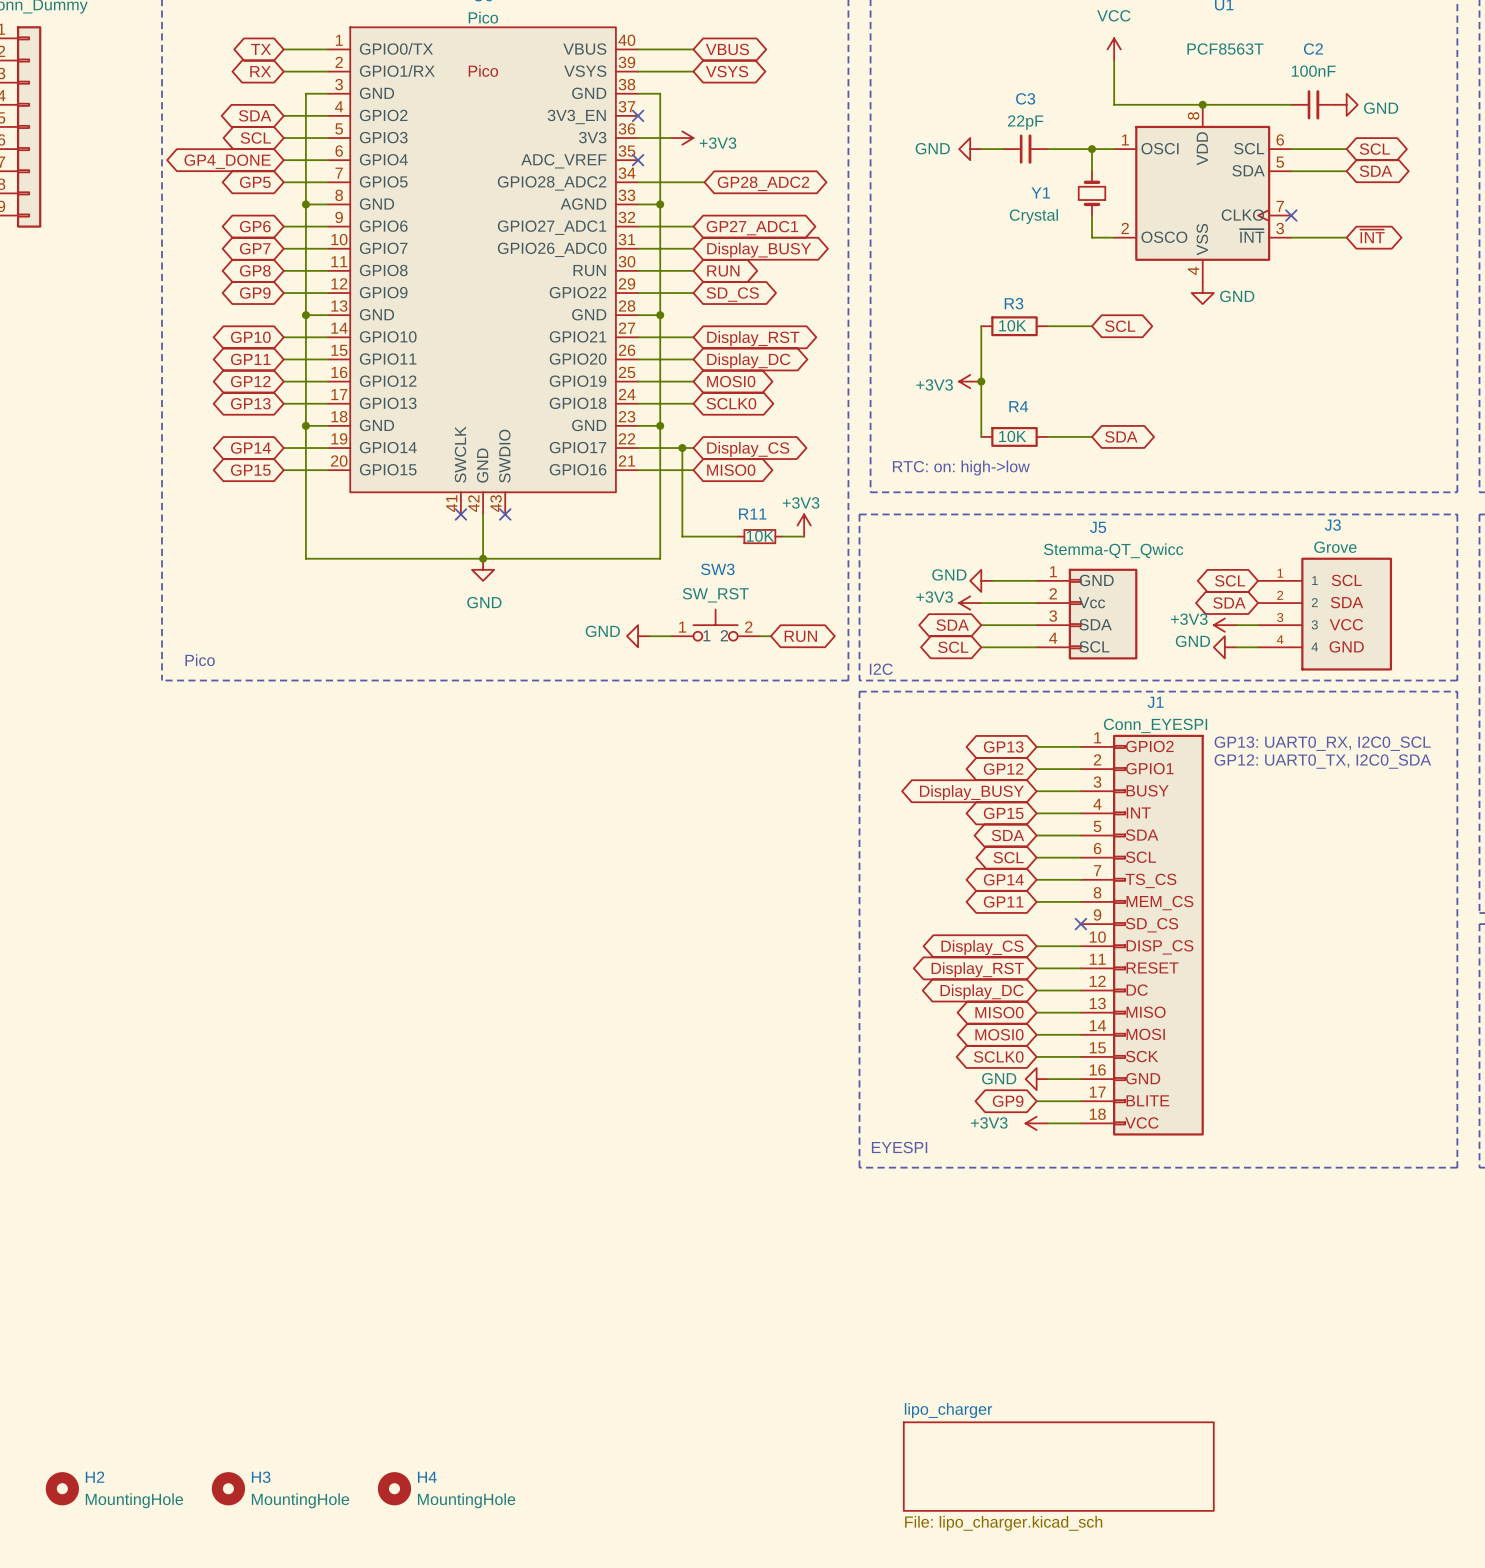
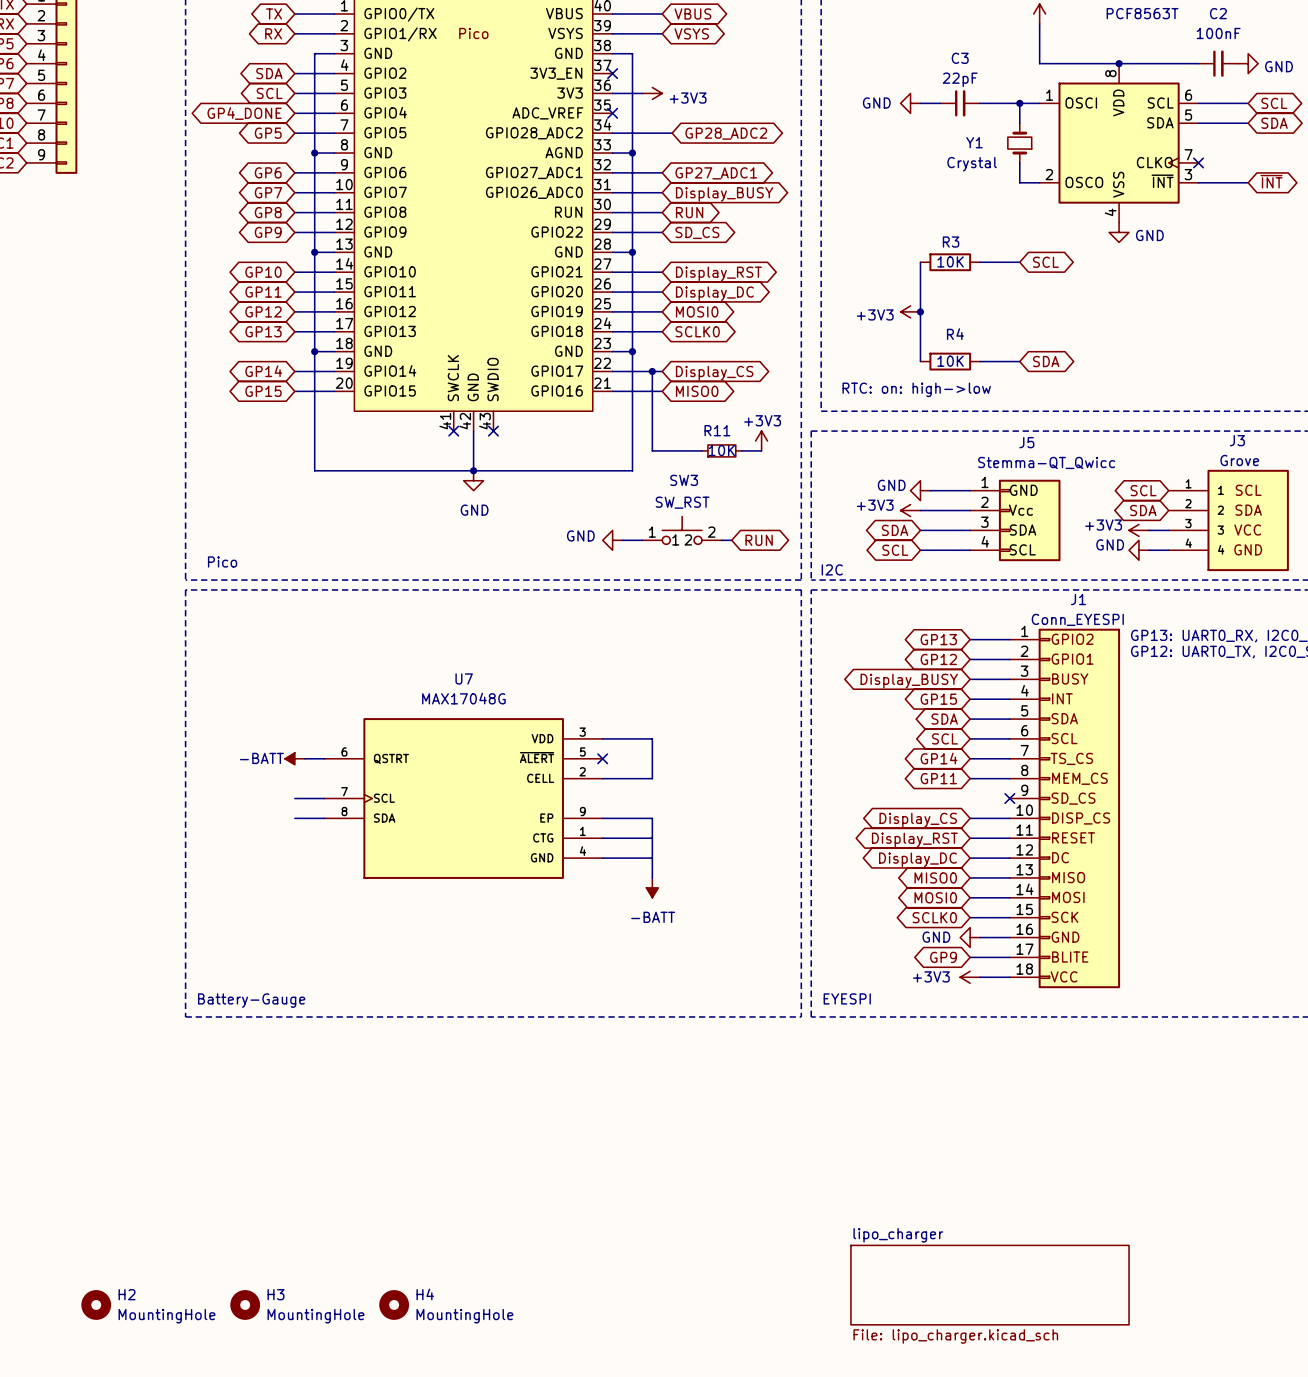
line: none -> (185, 589) (185, 1016) (801, 1016) (801, 589) (185, 589)
wire: none -> (602, 738) (652, 738) (652, 778) (602, 778)
power symbol: none -> -BATT (294, 758)
wire: none -> (304, 758) (324, 758)
no-connect mark: none -> (602, 758)
wire: none -> (294, 798) (324, 798)
U7: none -> MAX17048G (463, 798)
wire: none -> (294, 818) (324, 818)
wire: none -> (602, 818) (652, 818) (652, 877)
wire: none -> (602, 838) (652, 838)
wire: none -> (602, 858) (652, 858)
power symbol: none -> -BATT (652, 887)
text: none -> Battery-Gauge (251, 1000)

